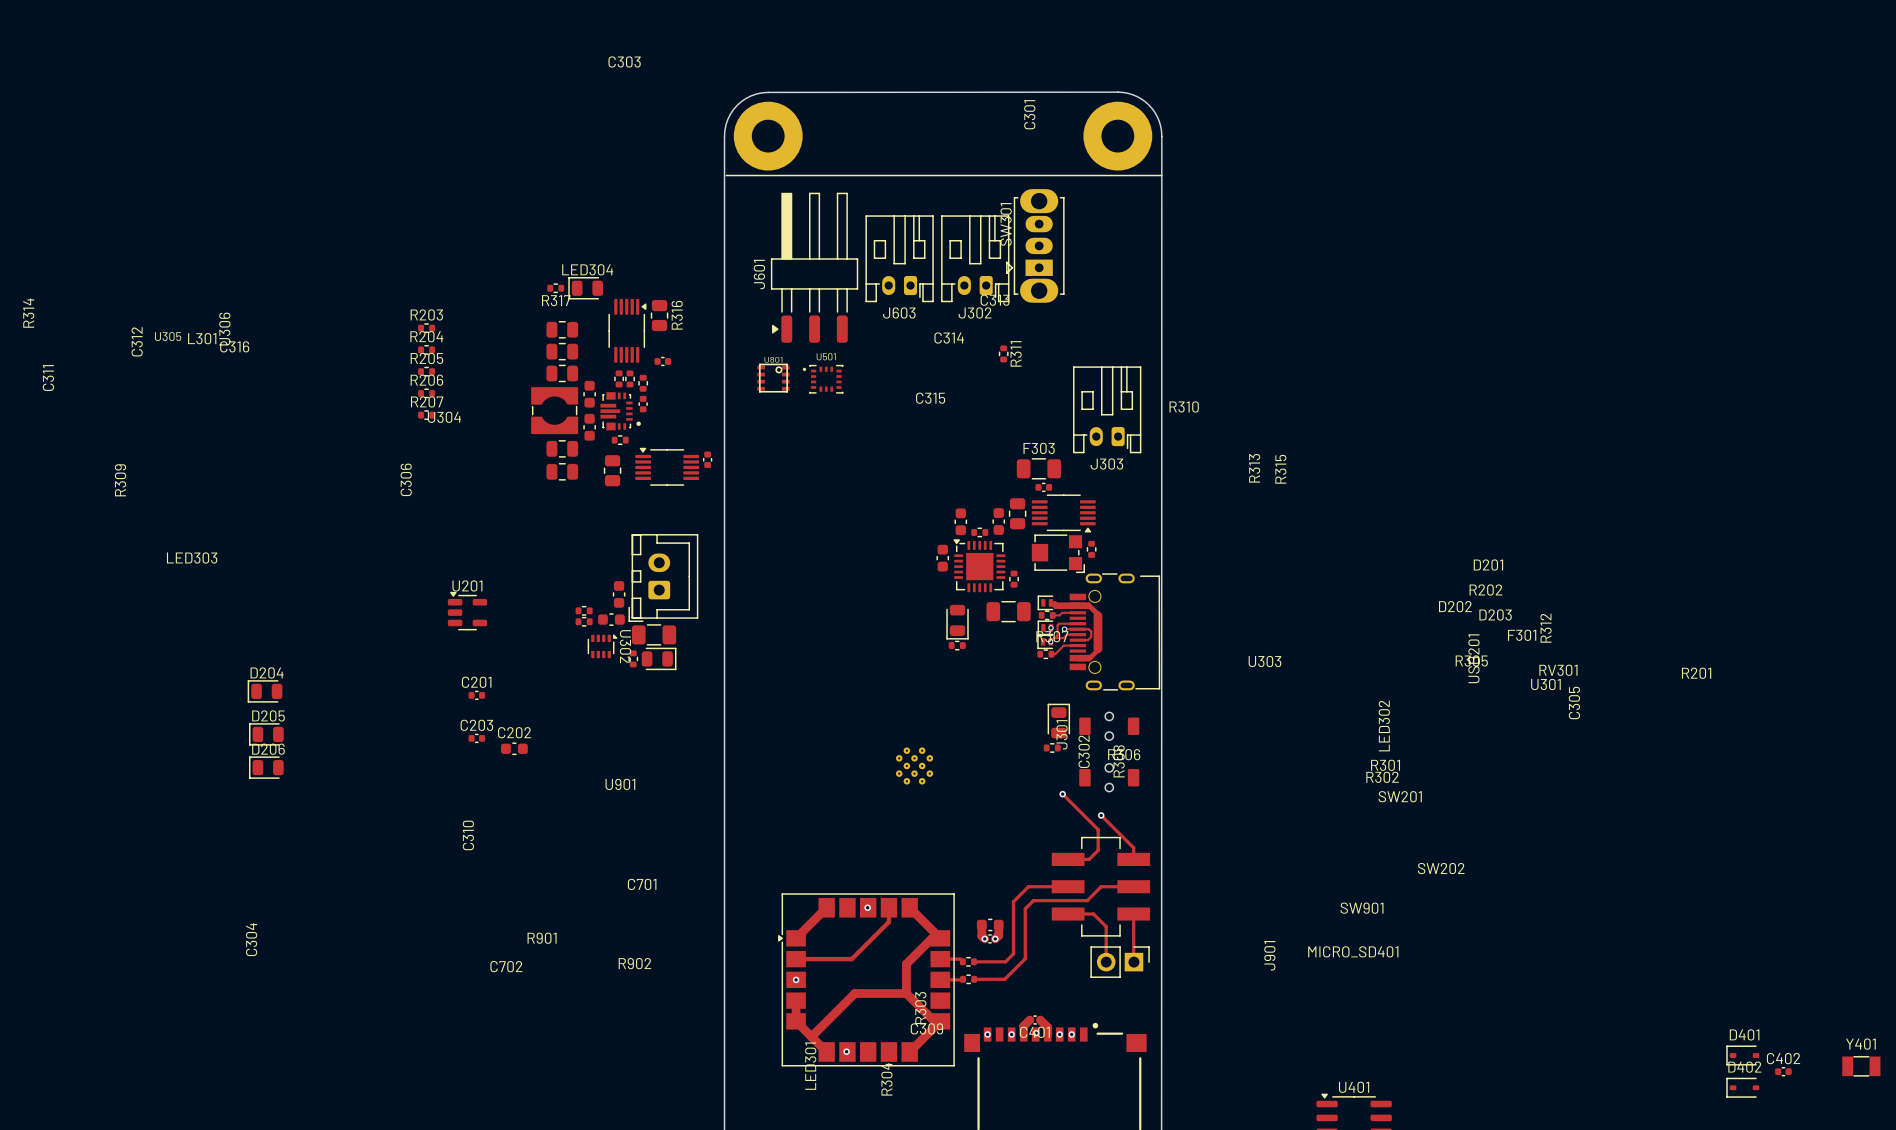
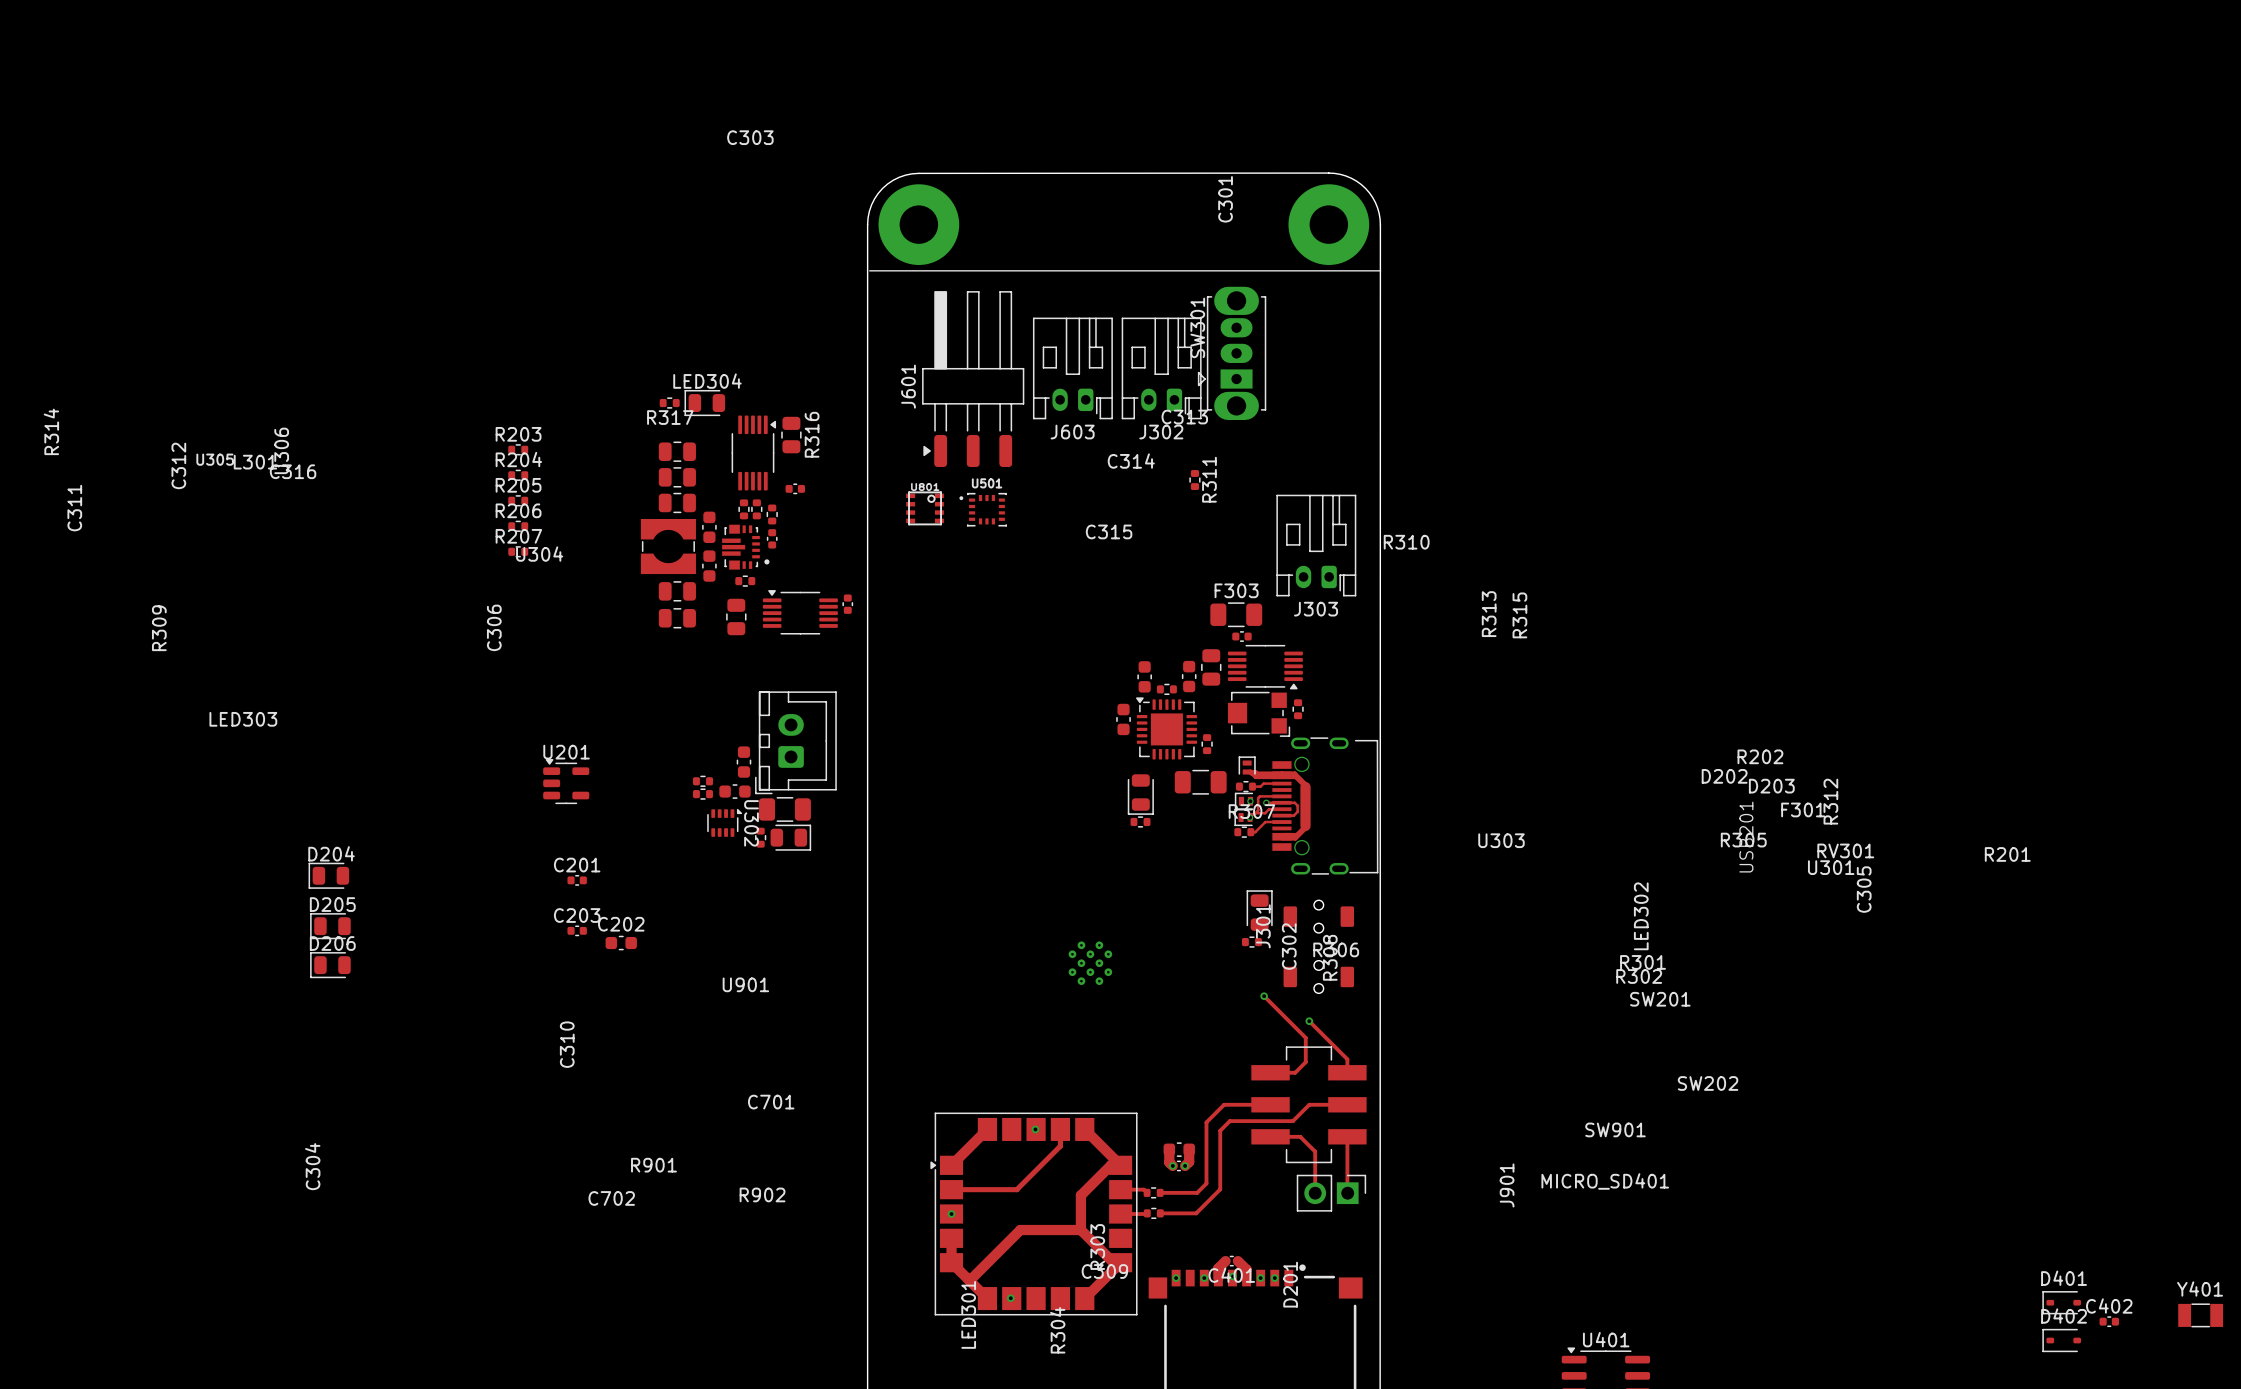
D201 rotation: 0° (1045, 602) -> 90° clockwise (1247, 765)

